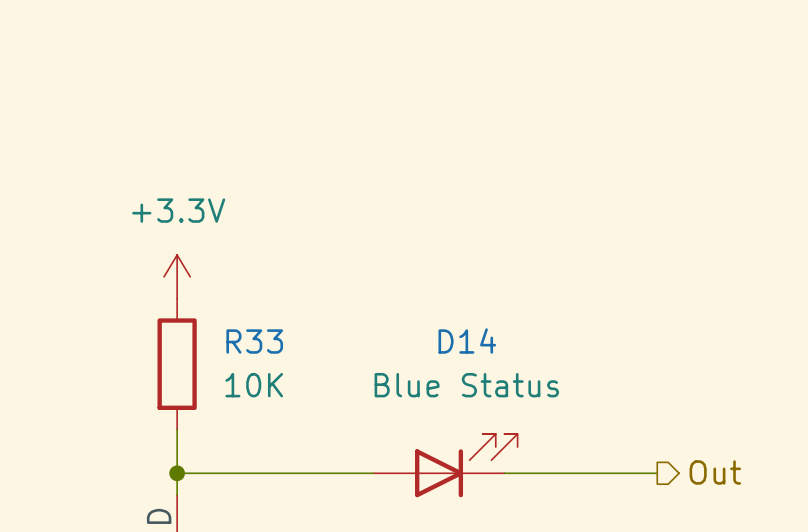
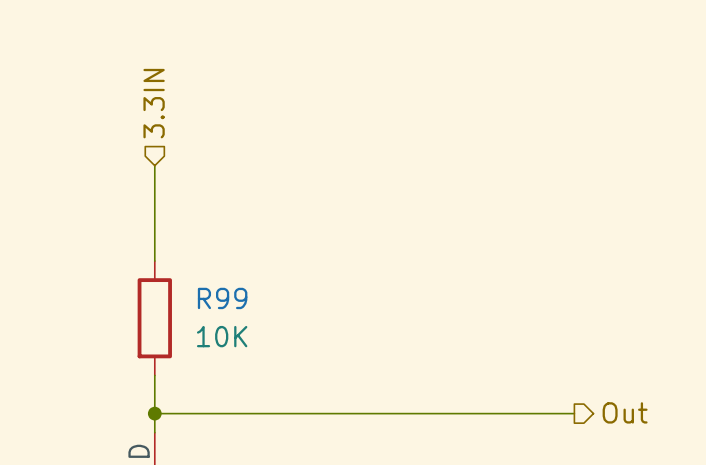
hierarchical label: none -> 3.3IN (154, 103)
wire: none -> (154, 165) (154, 261)
power symbol: +3.3V (177, 276) -> none
R33 name: R33 (254, 341) -> R99 (222, 298)
D14: Blue Status (445, 465) -> none

